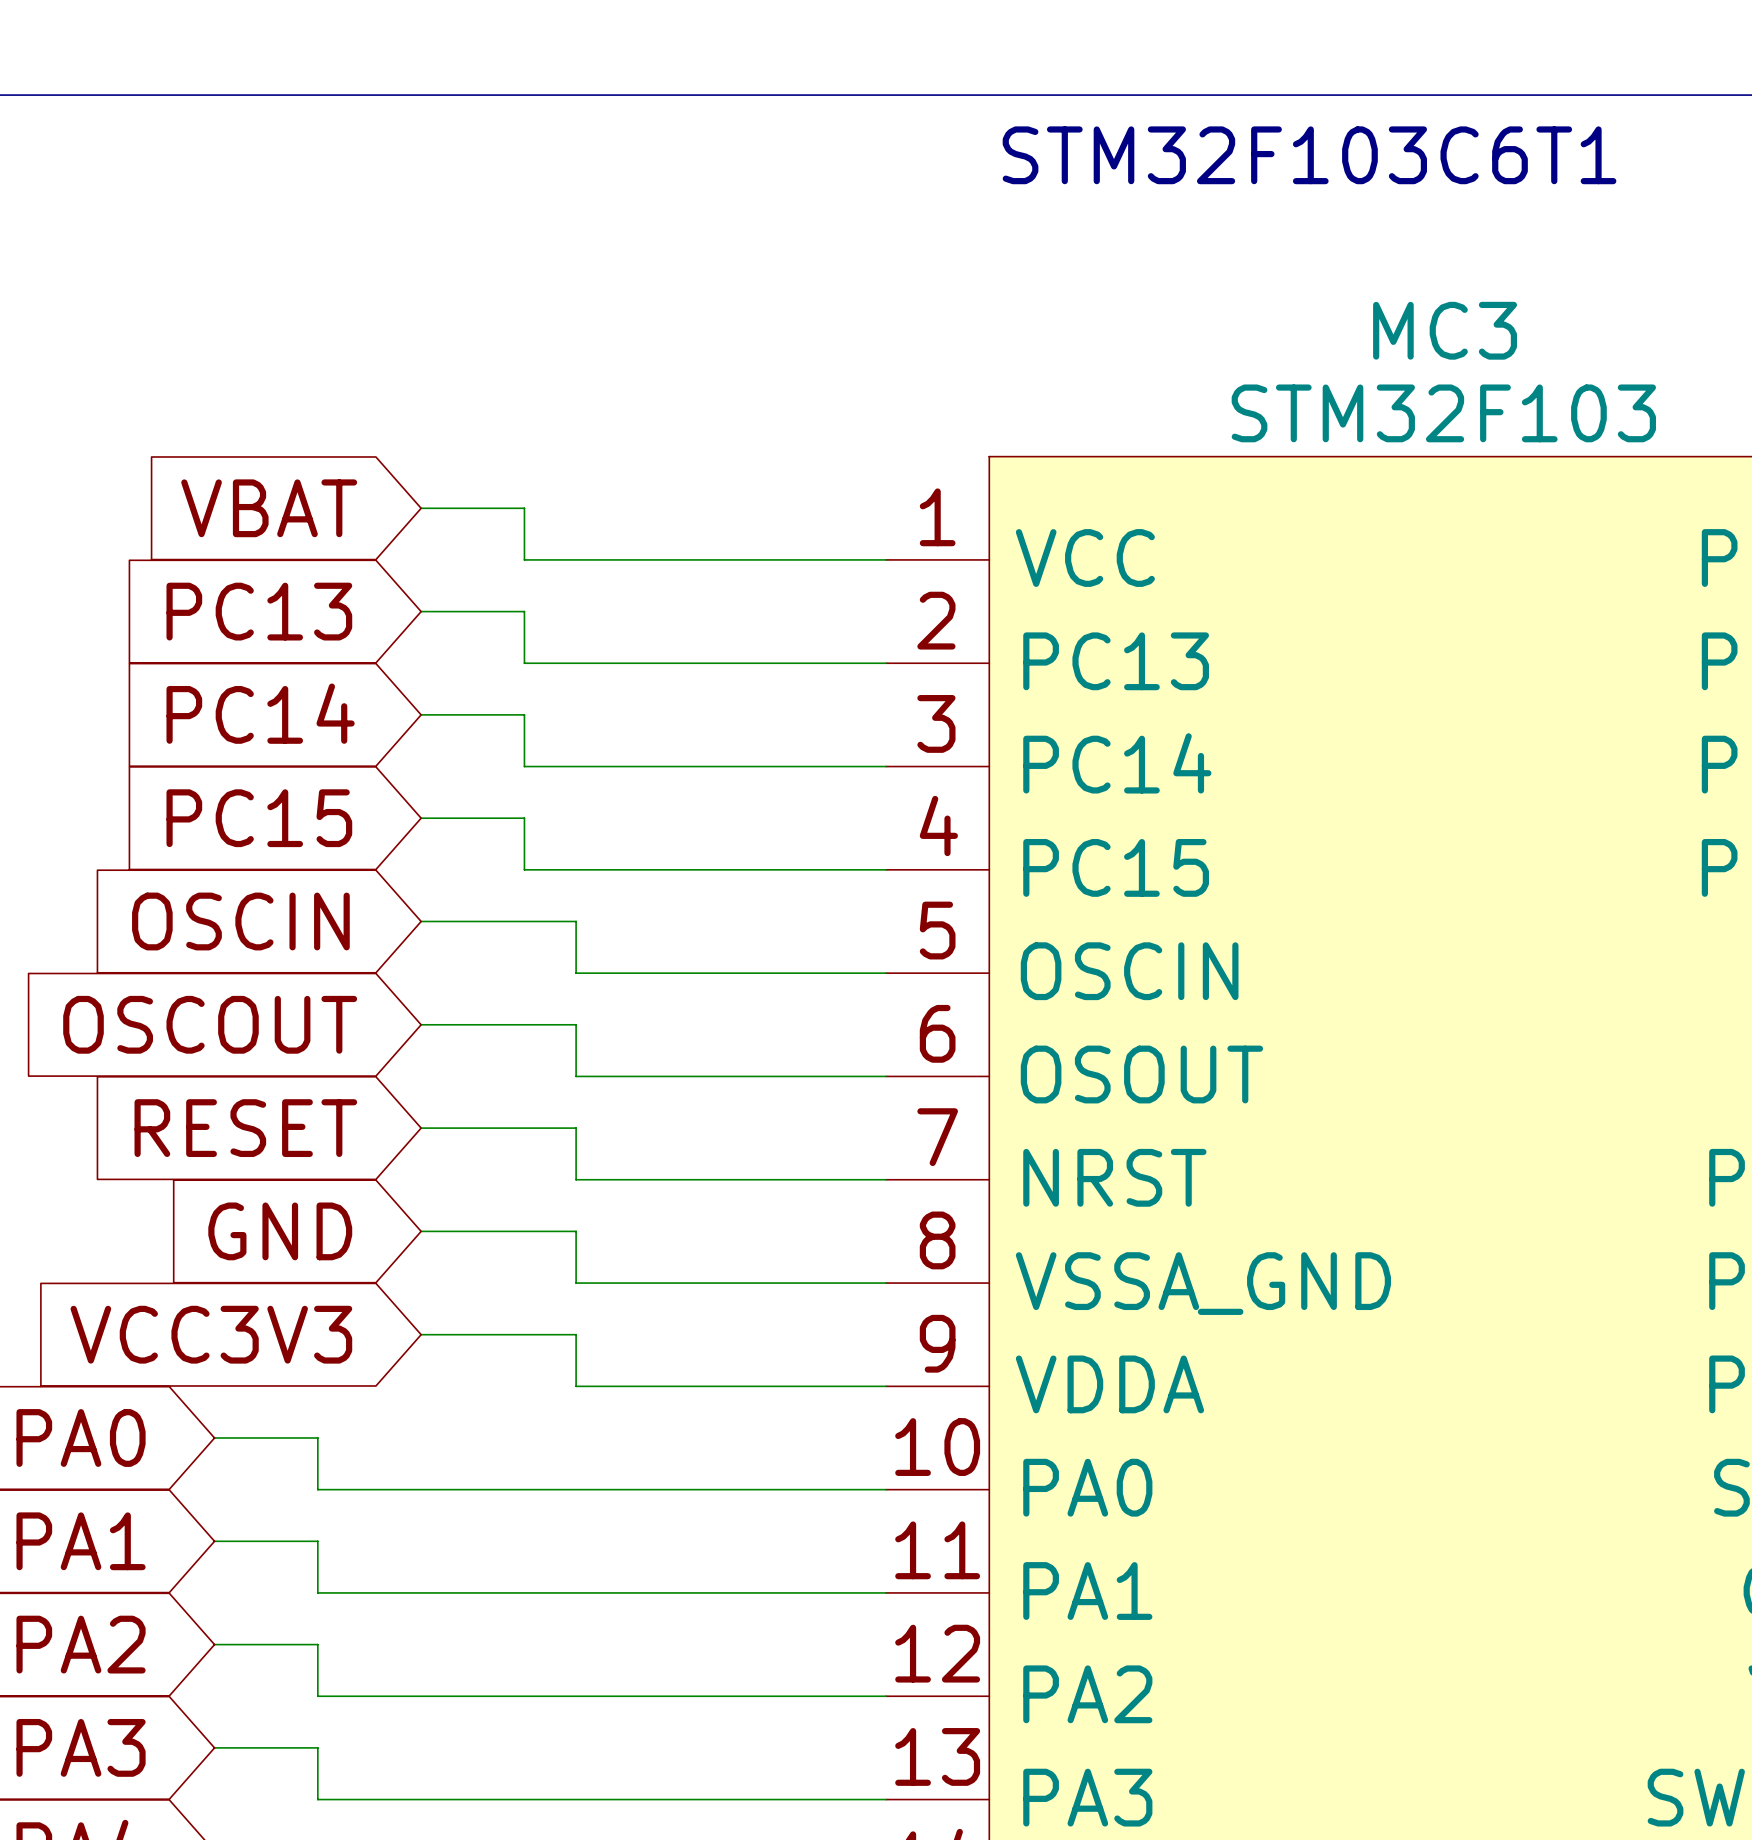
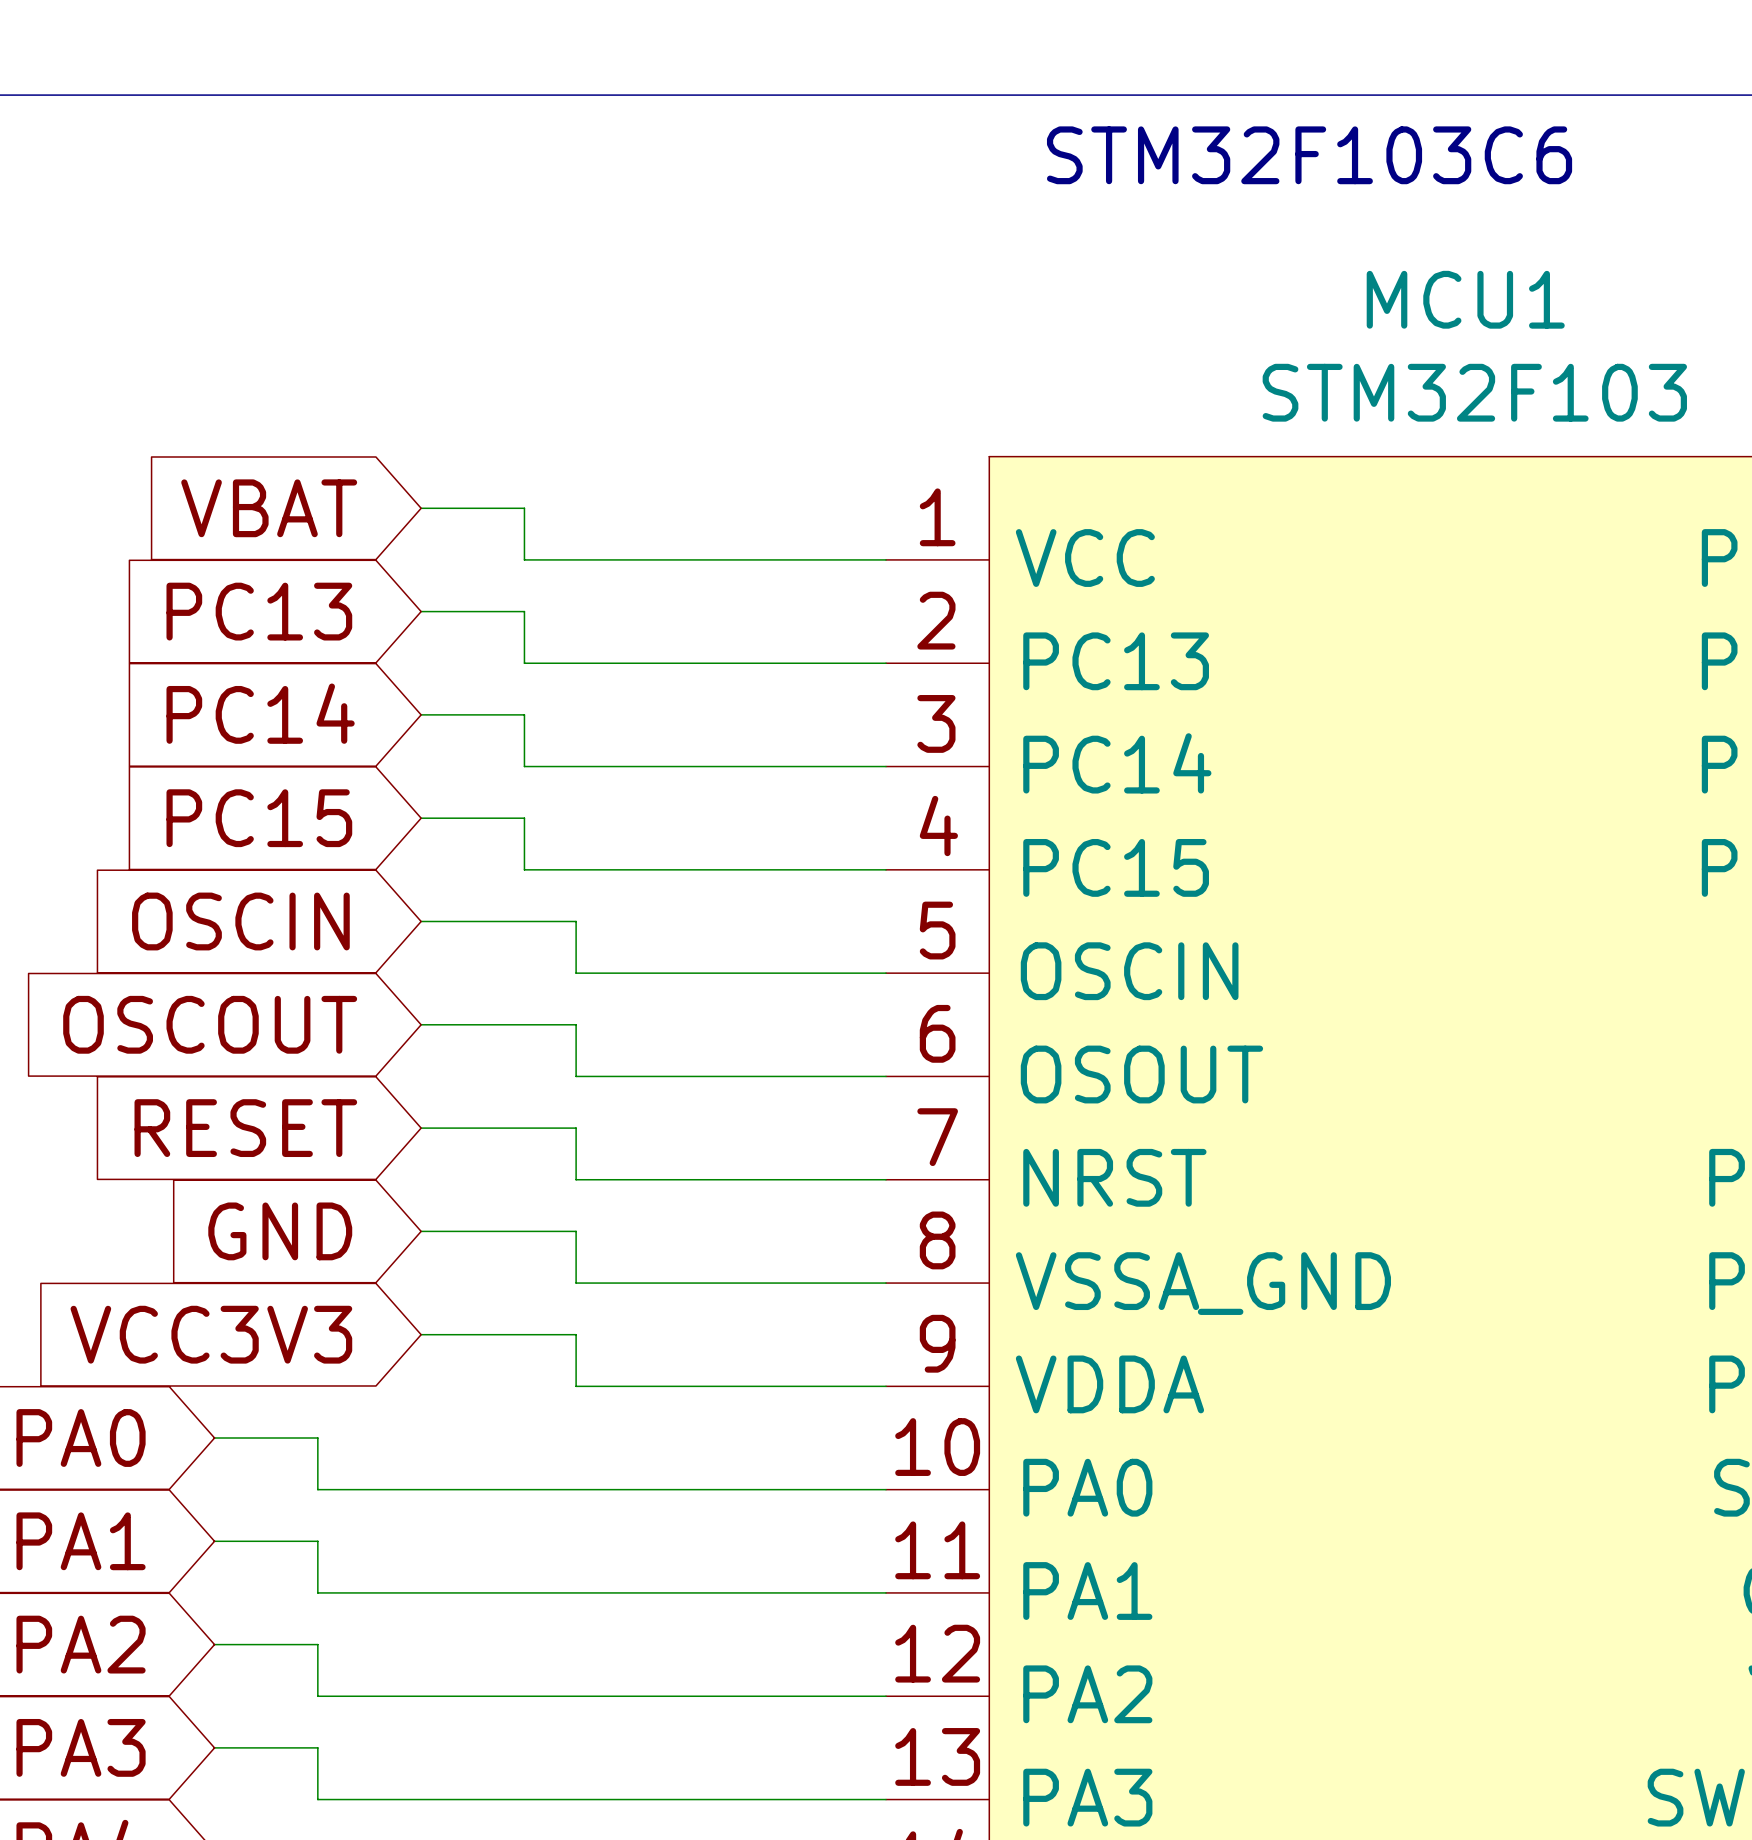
text: STM32F103C6T1 (1309, 155) -> STM32F103C6 (1309, 155)
MC3 name: MC3 (1445, 330) -> MCU1 (1465, 299)
MC3 value position: STM32F103 (1443, 413) -> STM32F103 (1474, 392)

